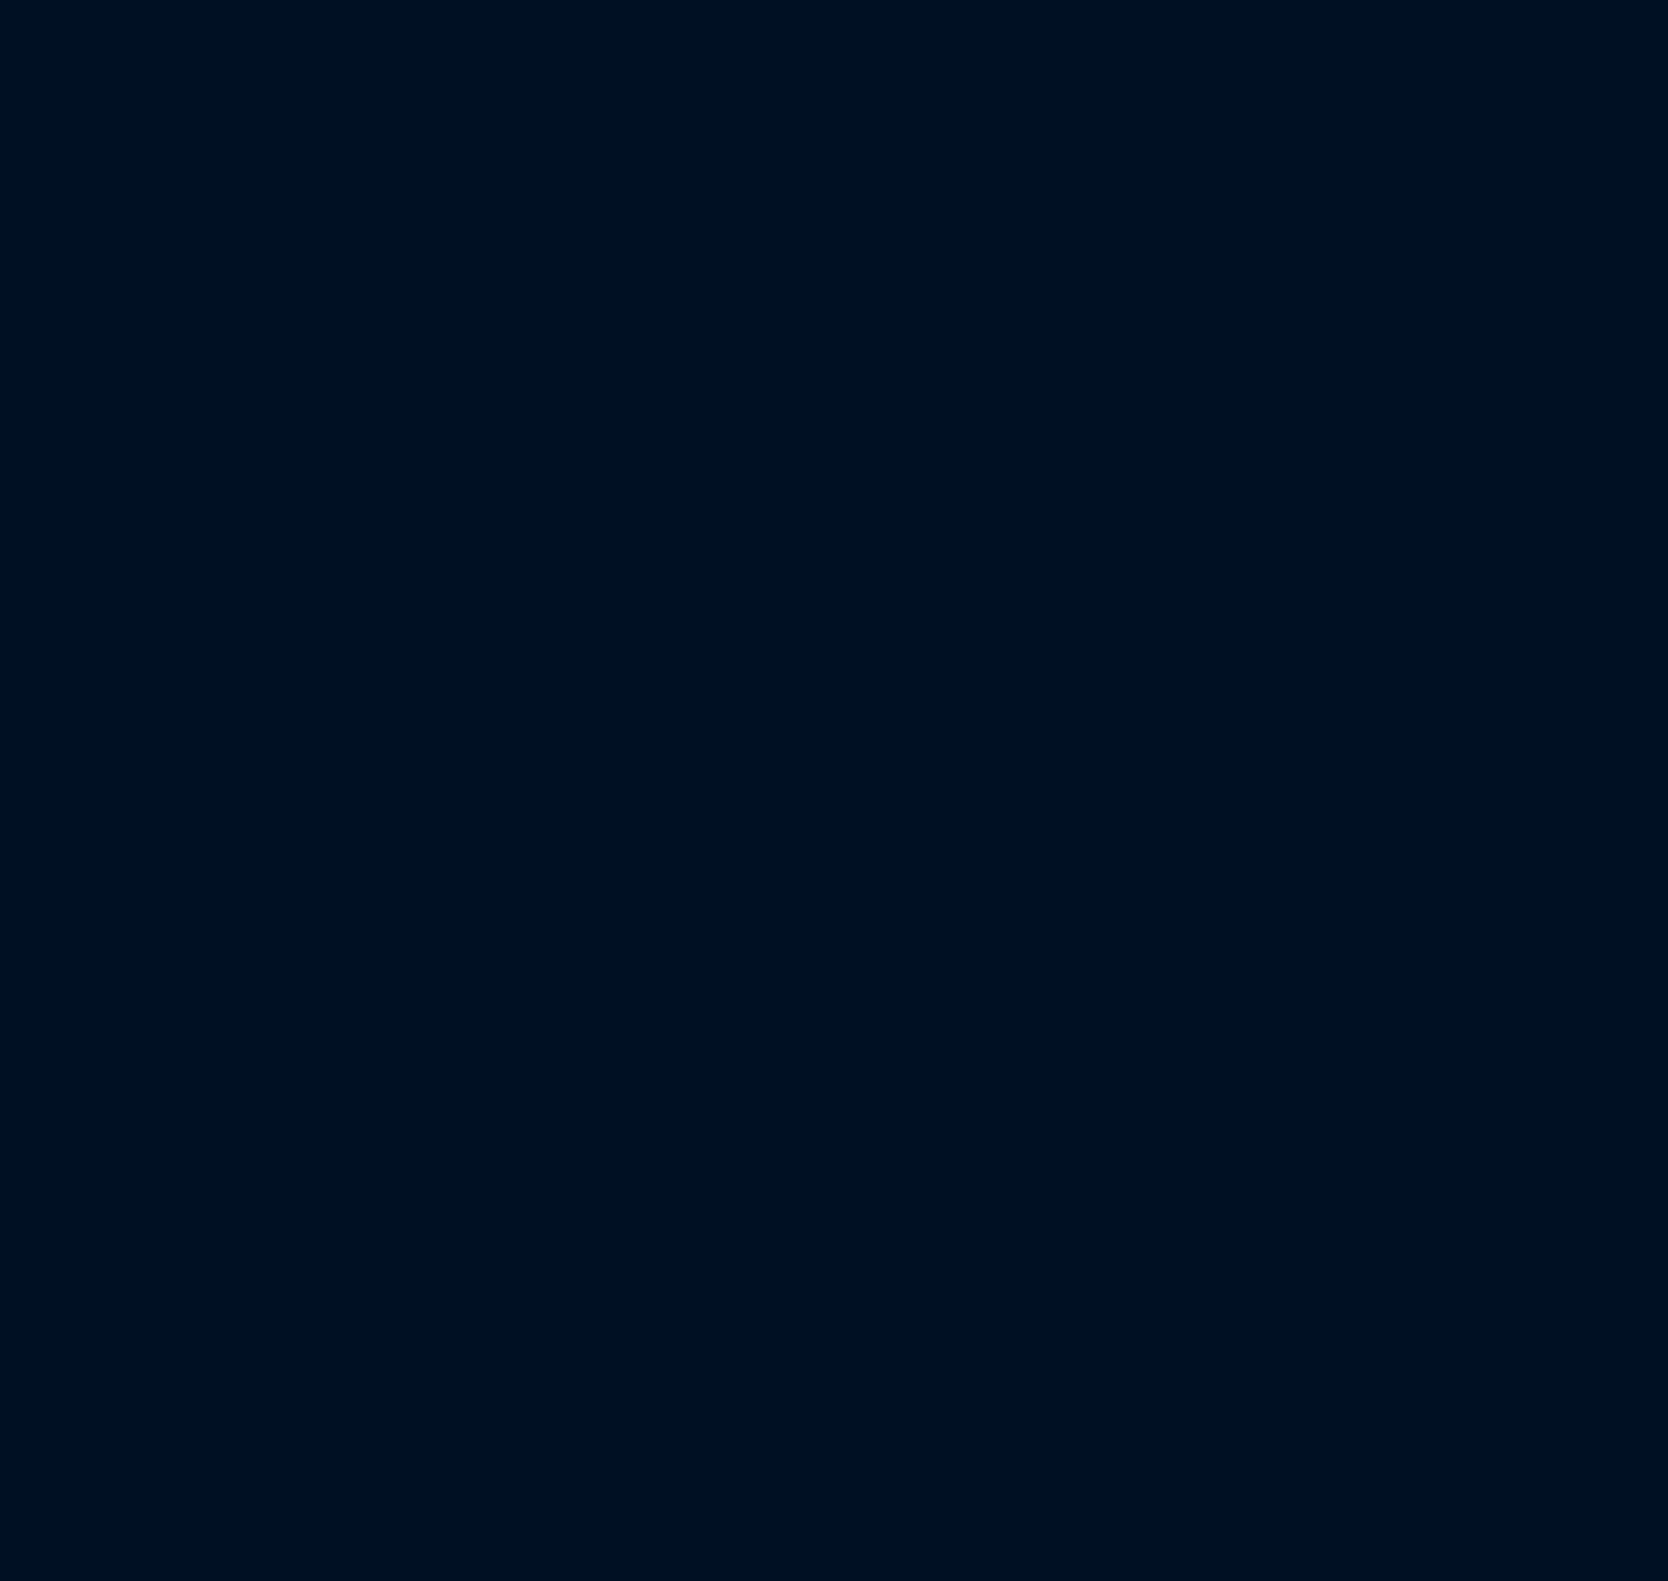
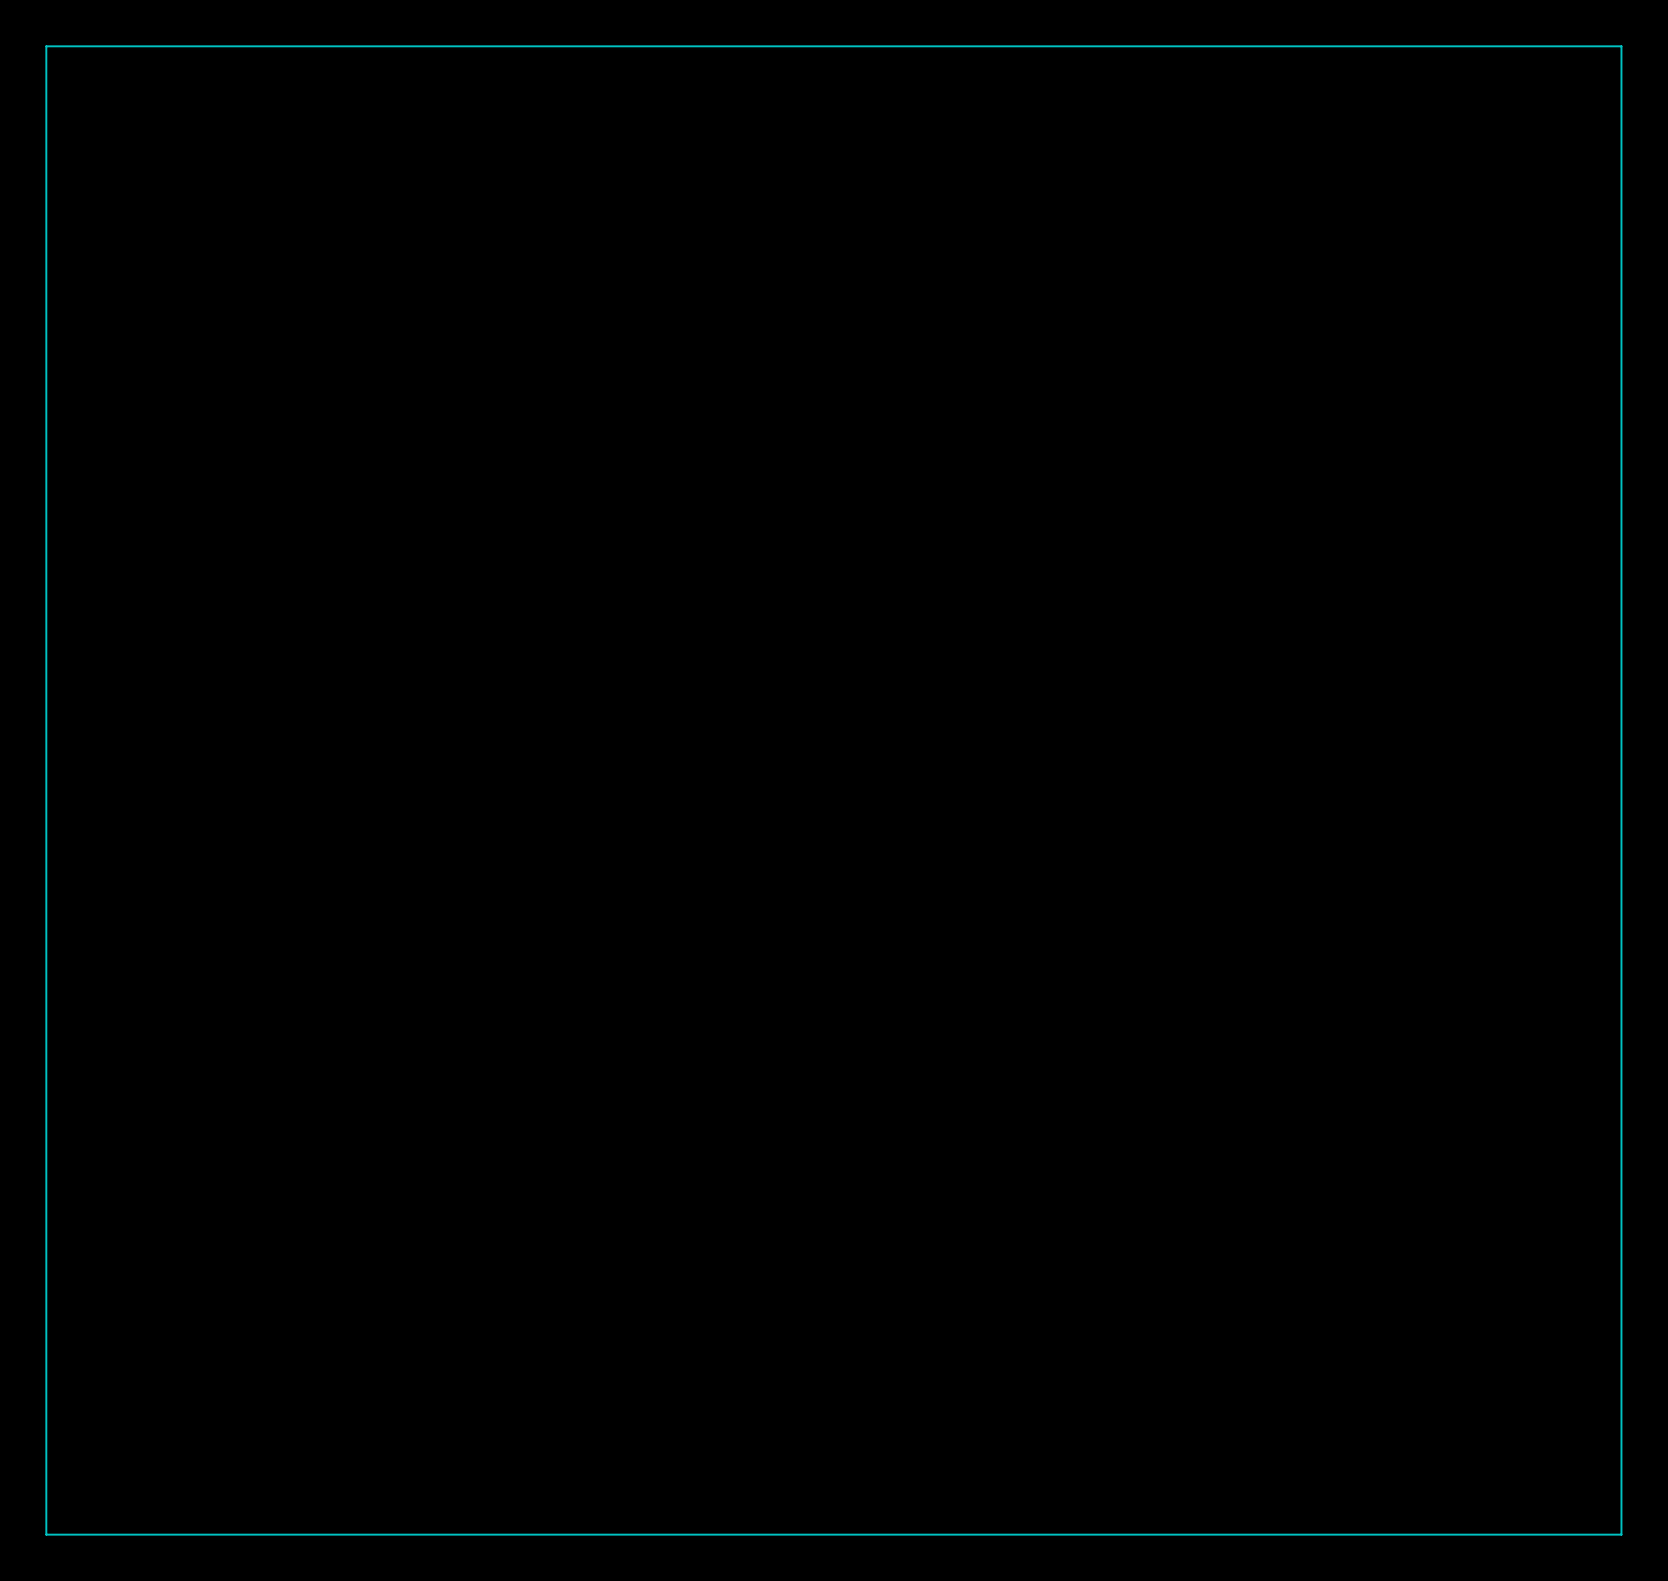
line: none -> (46, 46) (46, 1534) (1621, 1534) (1621, 46) (46, 46)

